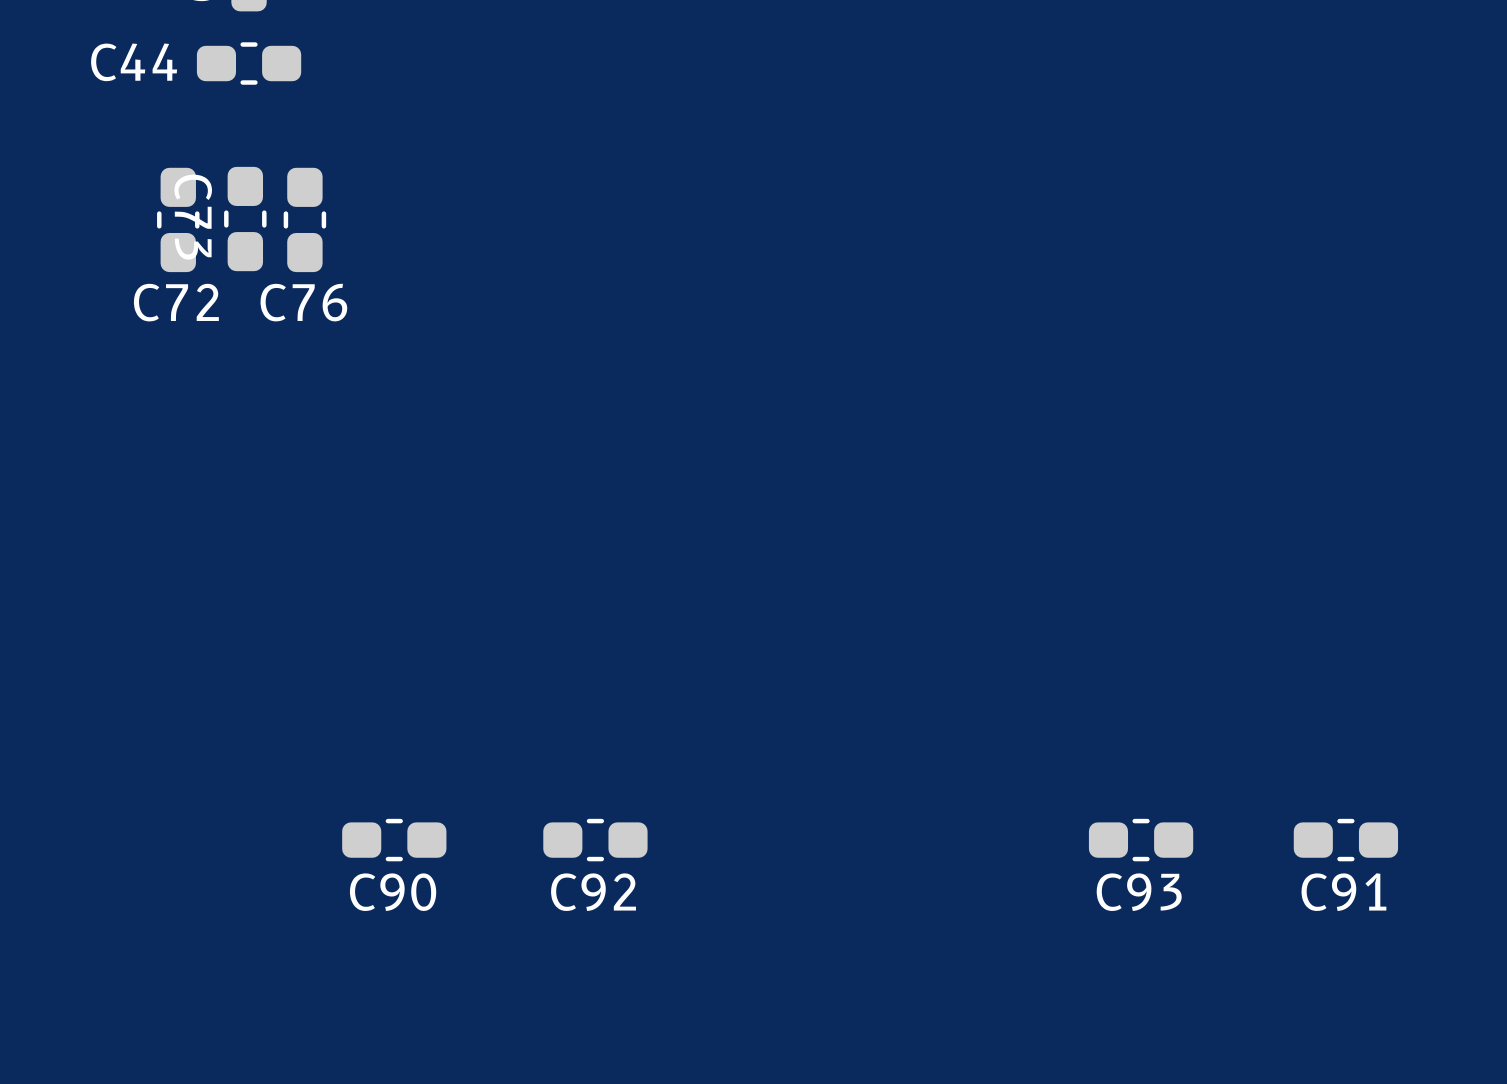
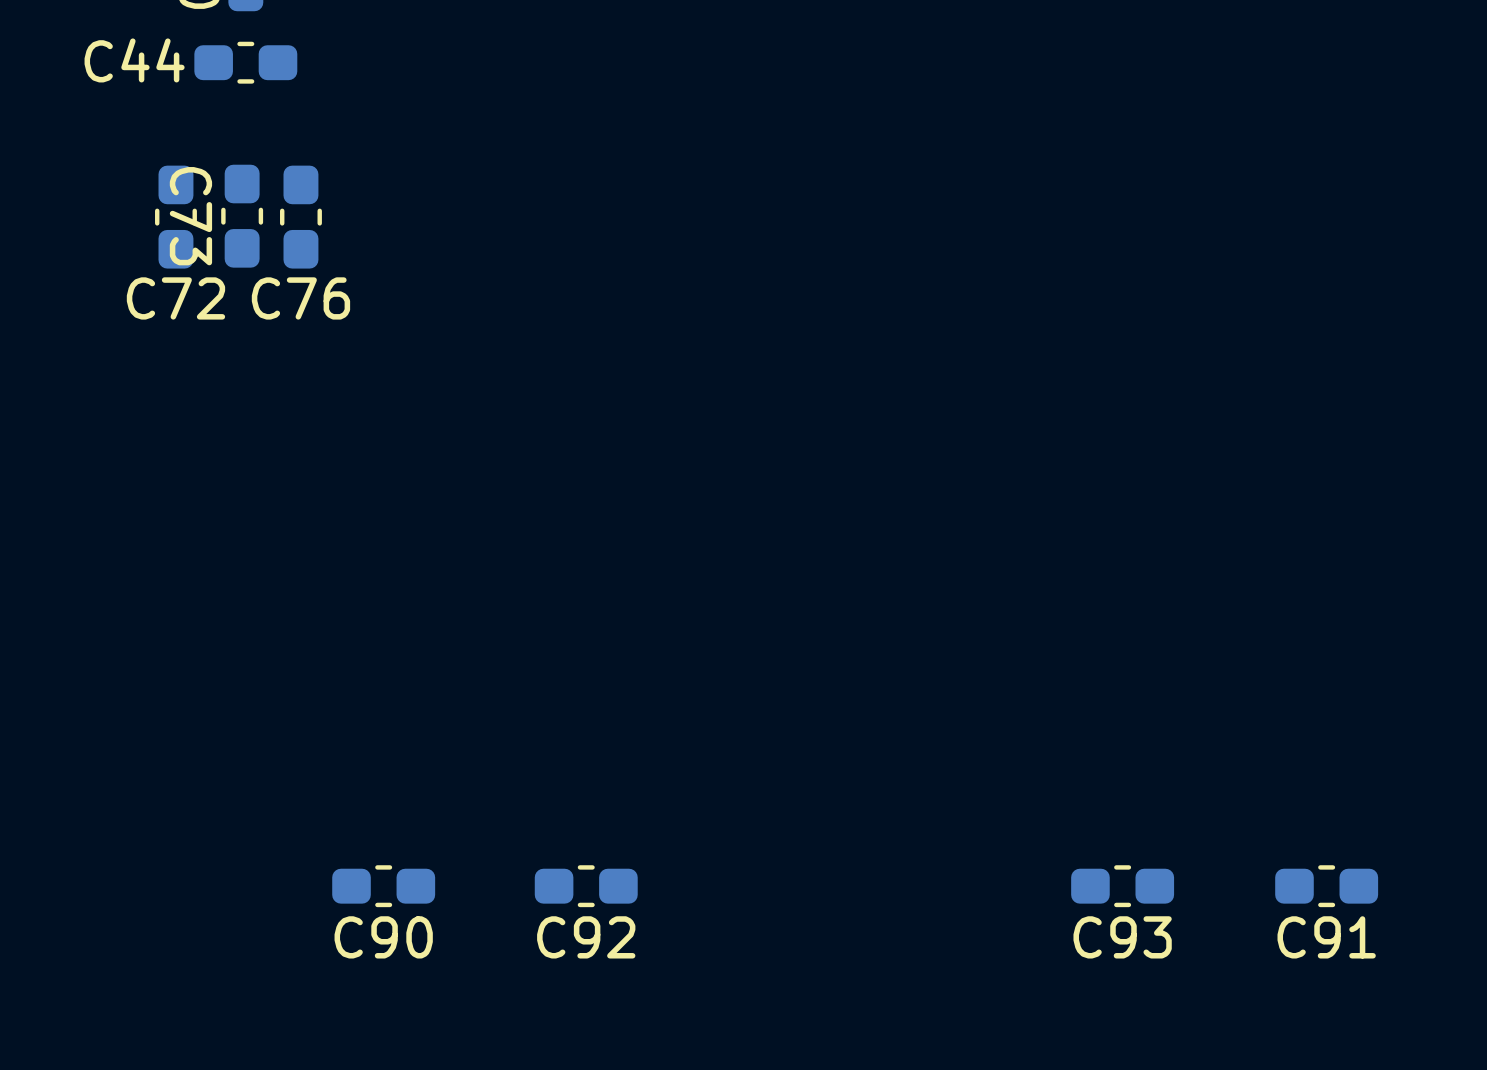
C90 position: (394, 840) -> (383, 886)
C92 position: (595, 840) -> (586, 886)
C93 position: (1141, 840) -> (1122, 886)
C91 position: (1345, 840) -> (1326, 886)

